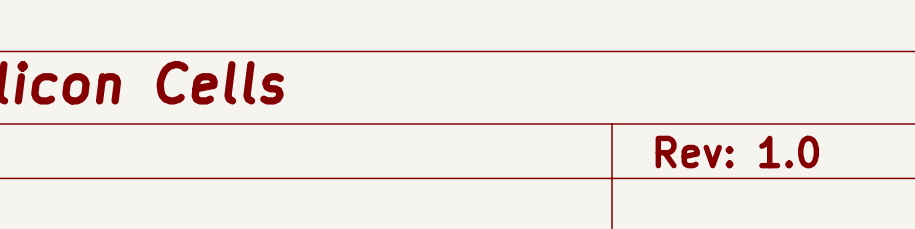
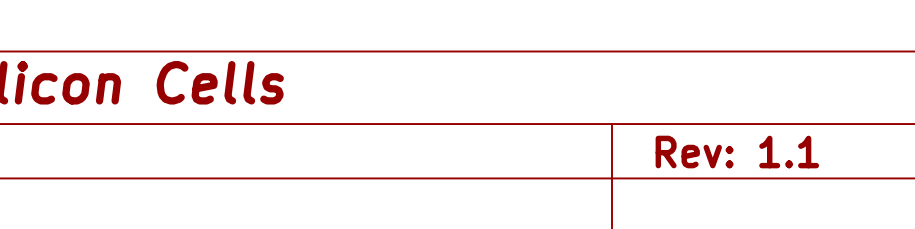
title block: Rev: 1.0 (737, 152) -> Rev: 1.1 (737, 152)

